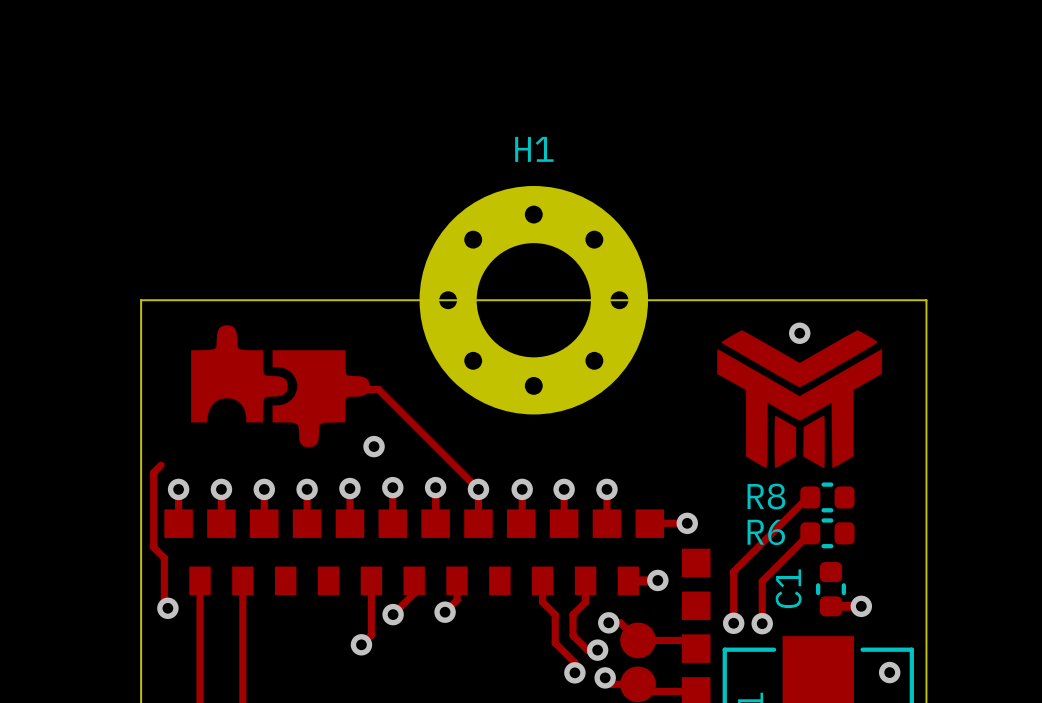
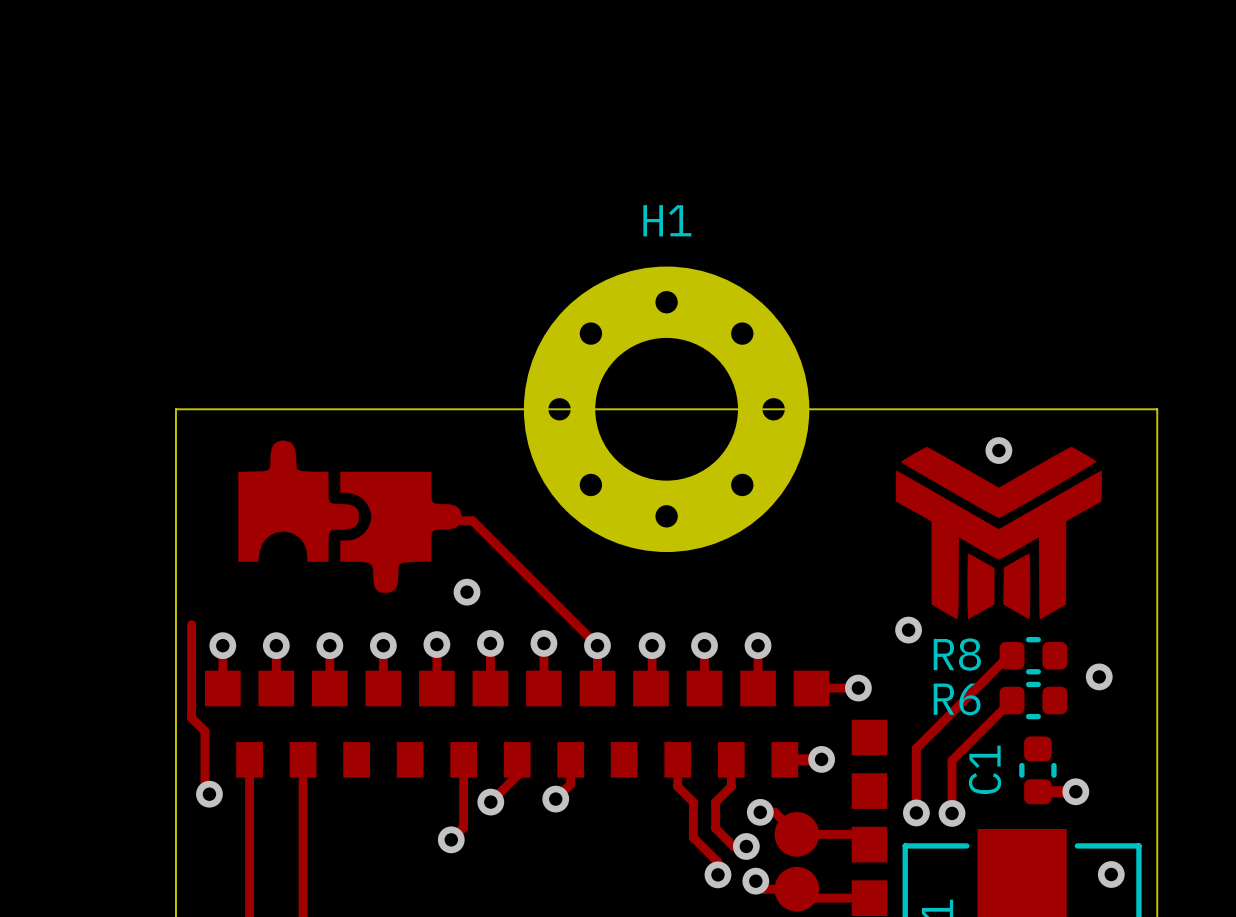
track: (161, 465) (153, 472) -> none
via: none -> (908, 630)
via: none -> (1099, 676)

